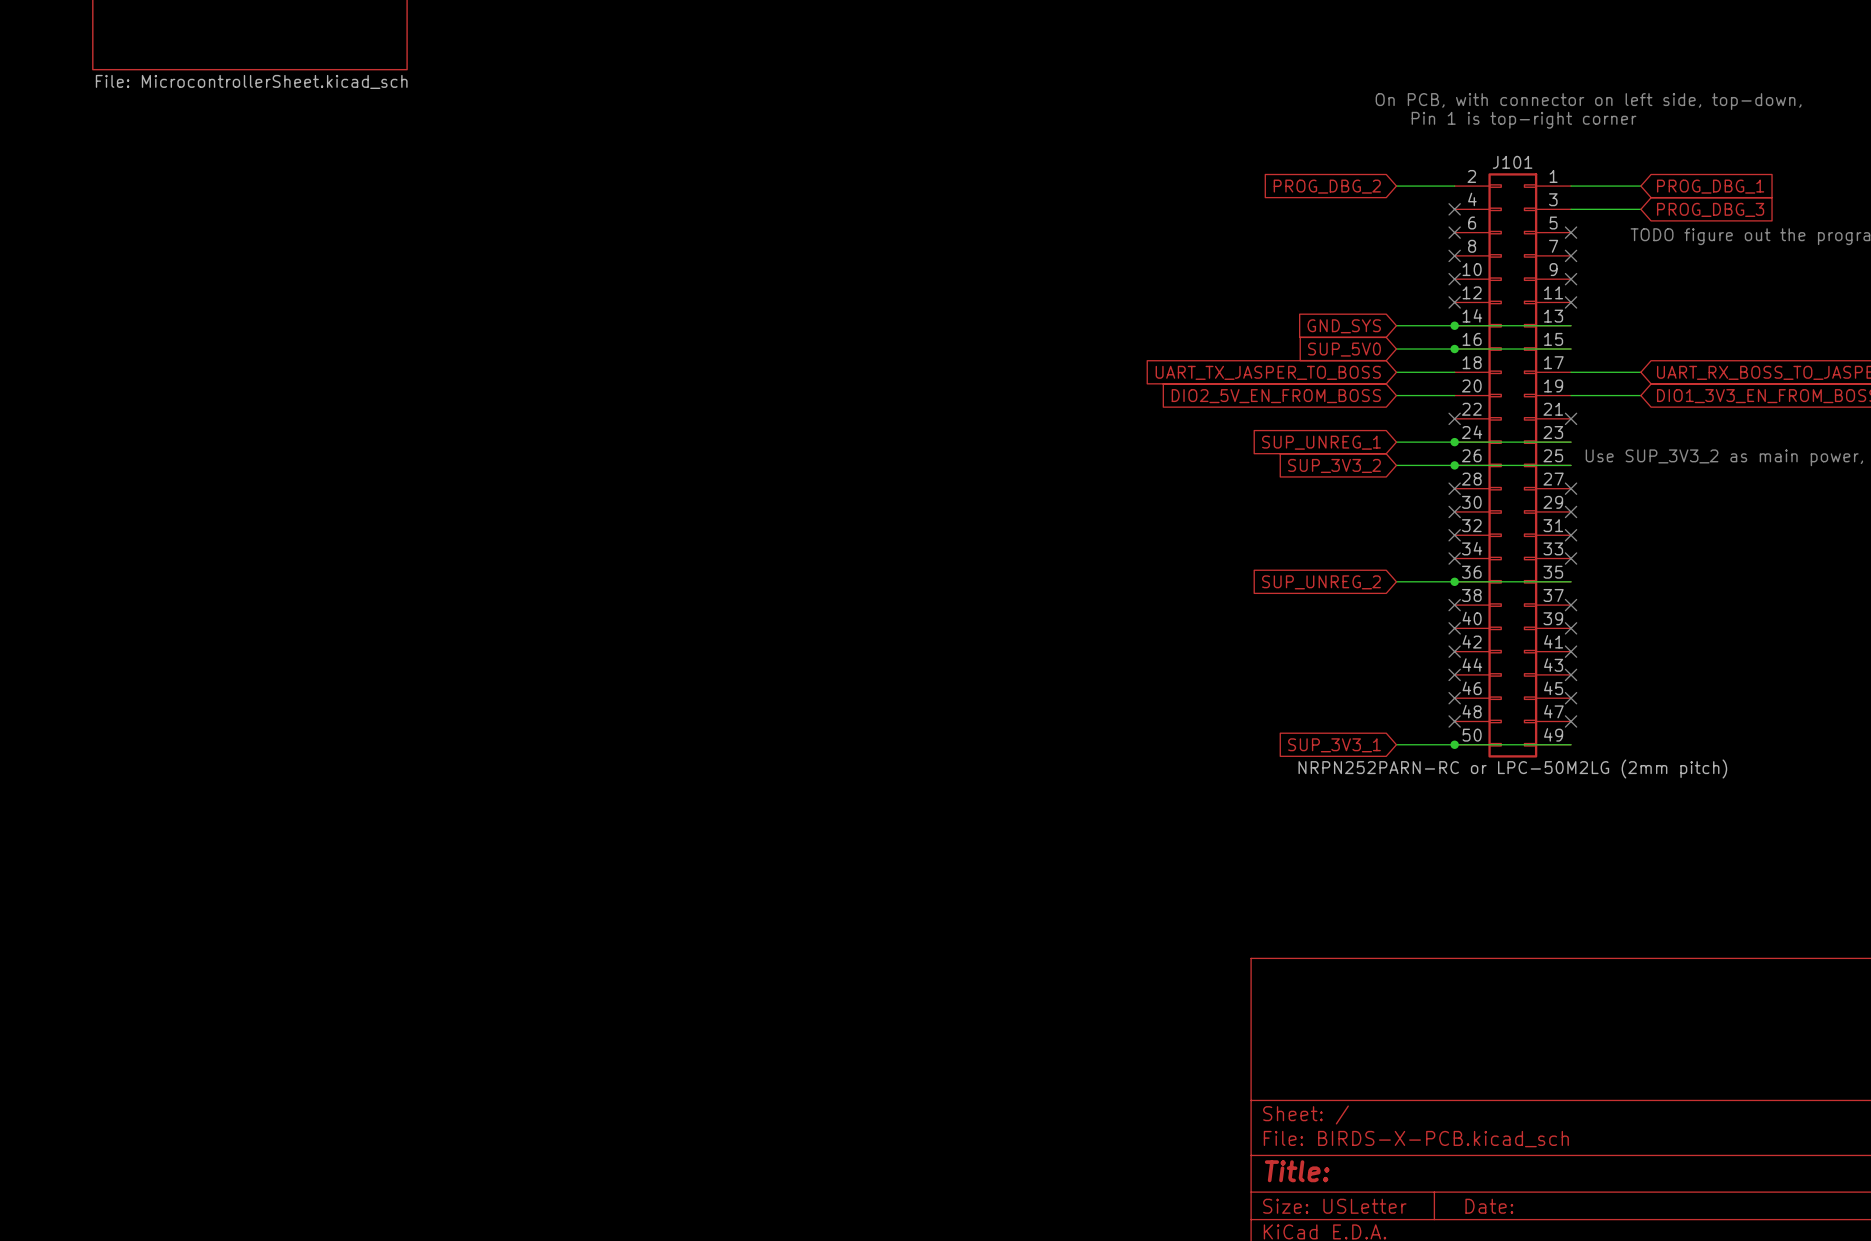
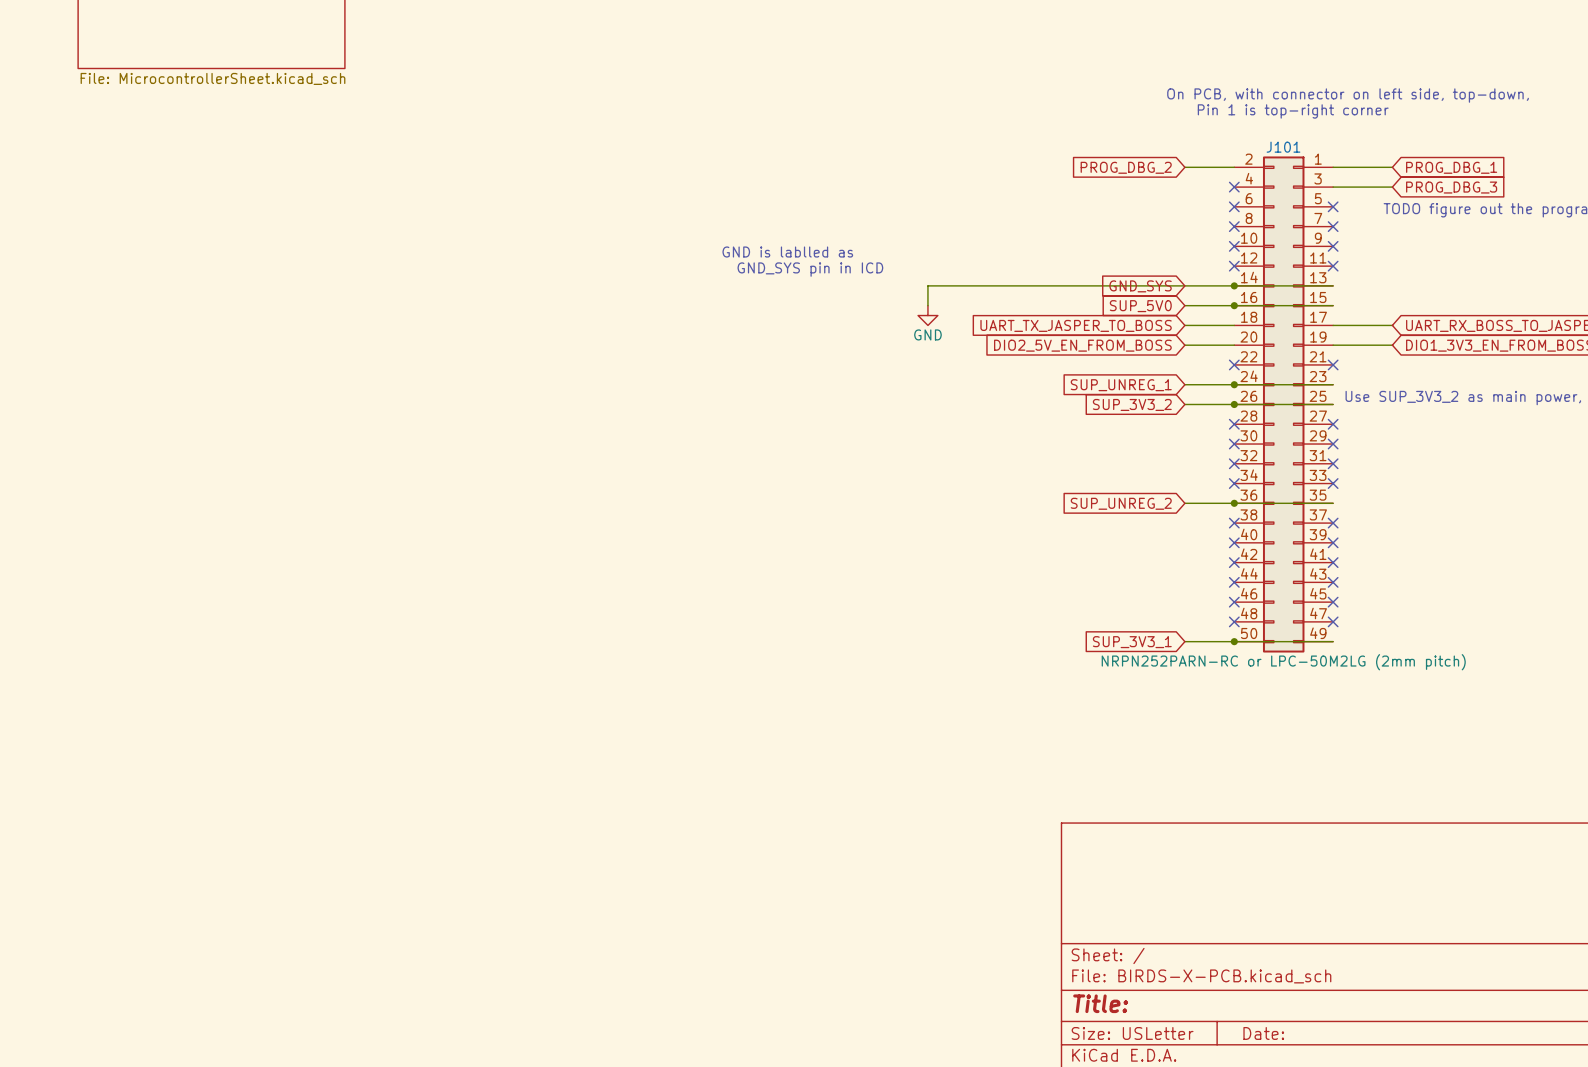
text: none -> GND is lablled as (787, 252)
text: none -> GND_SYS pin in ICD (810, 269)
wire: none -> (1184, 285) (927, 285) (927, 305)
power symbol: none -> GND (927, 315)

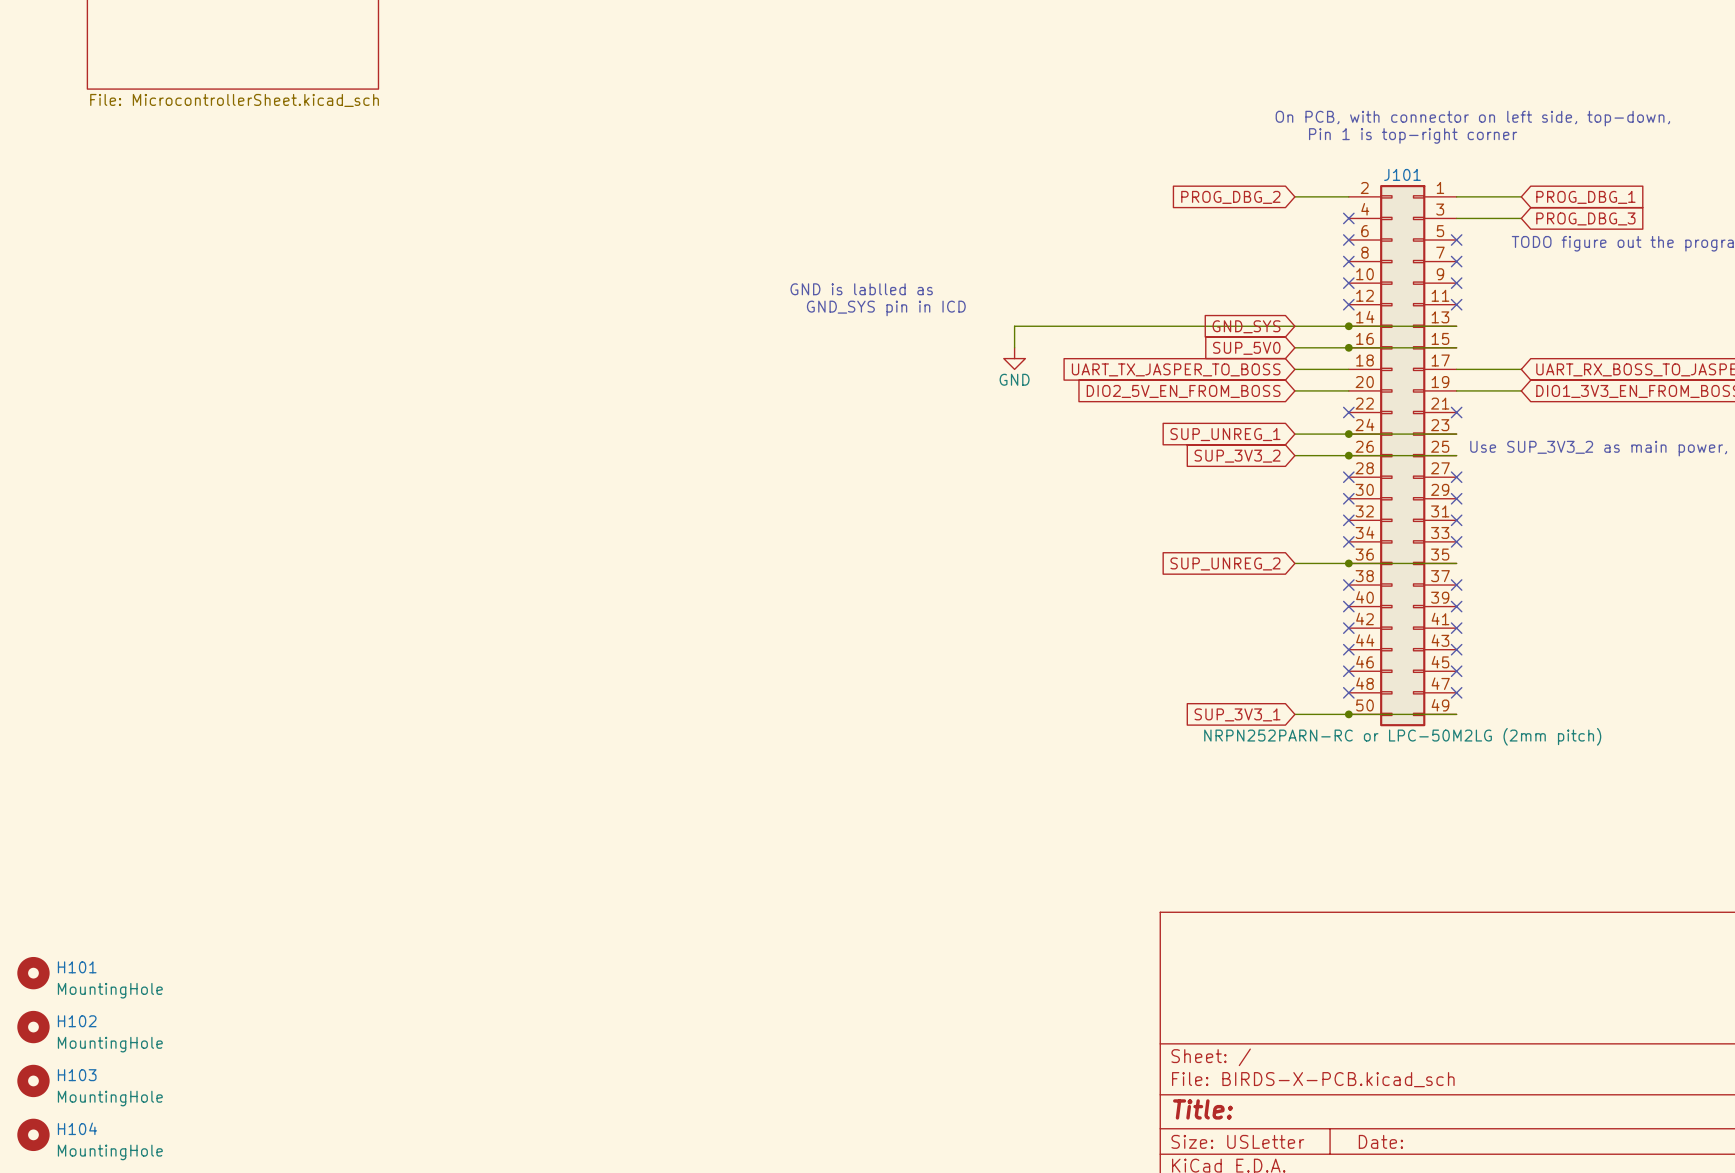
H101: none -> MountingHole (33, 973)
H102: none -> MountingHole (33, 1027)
H103: none -> MountingHole (33, 1080)
H104: none -> MountingHole (33, 1134)

